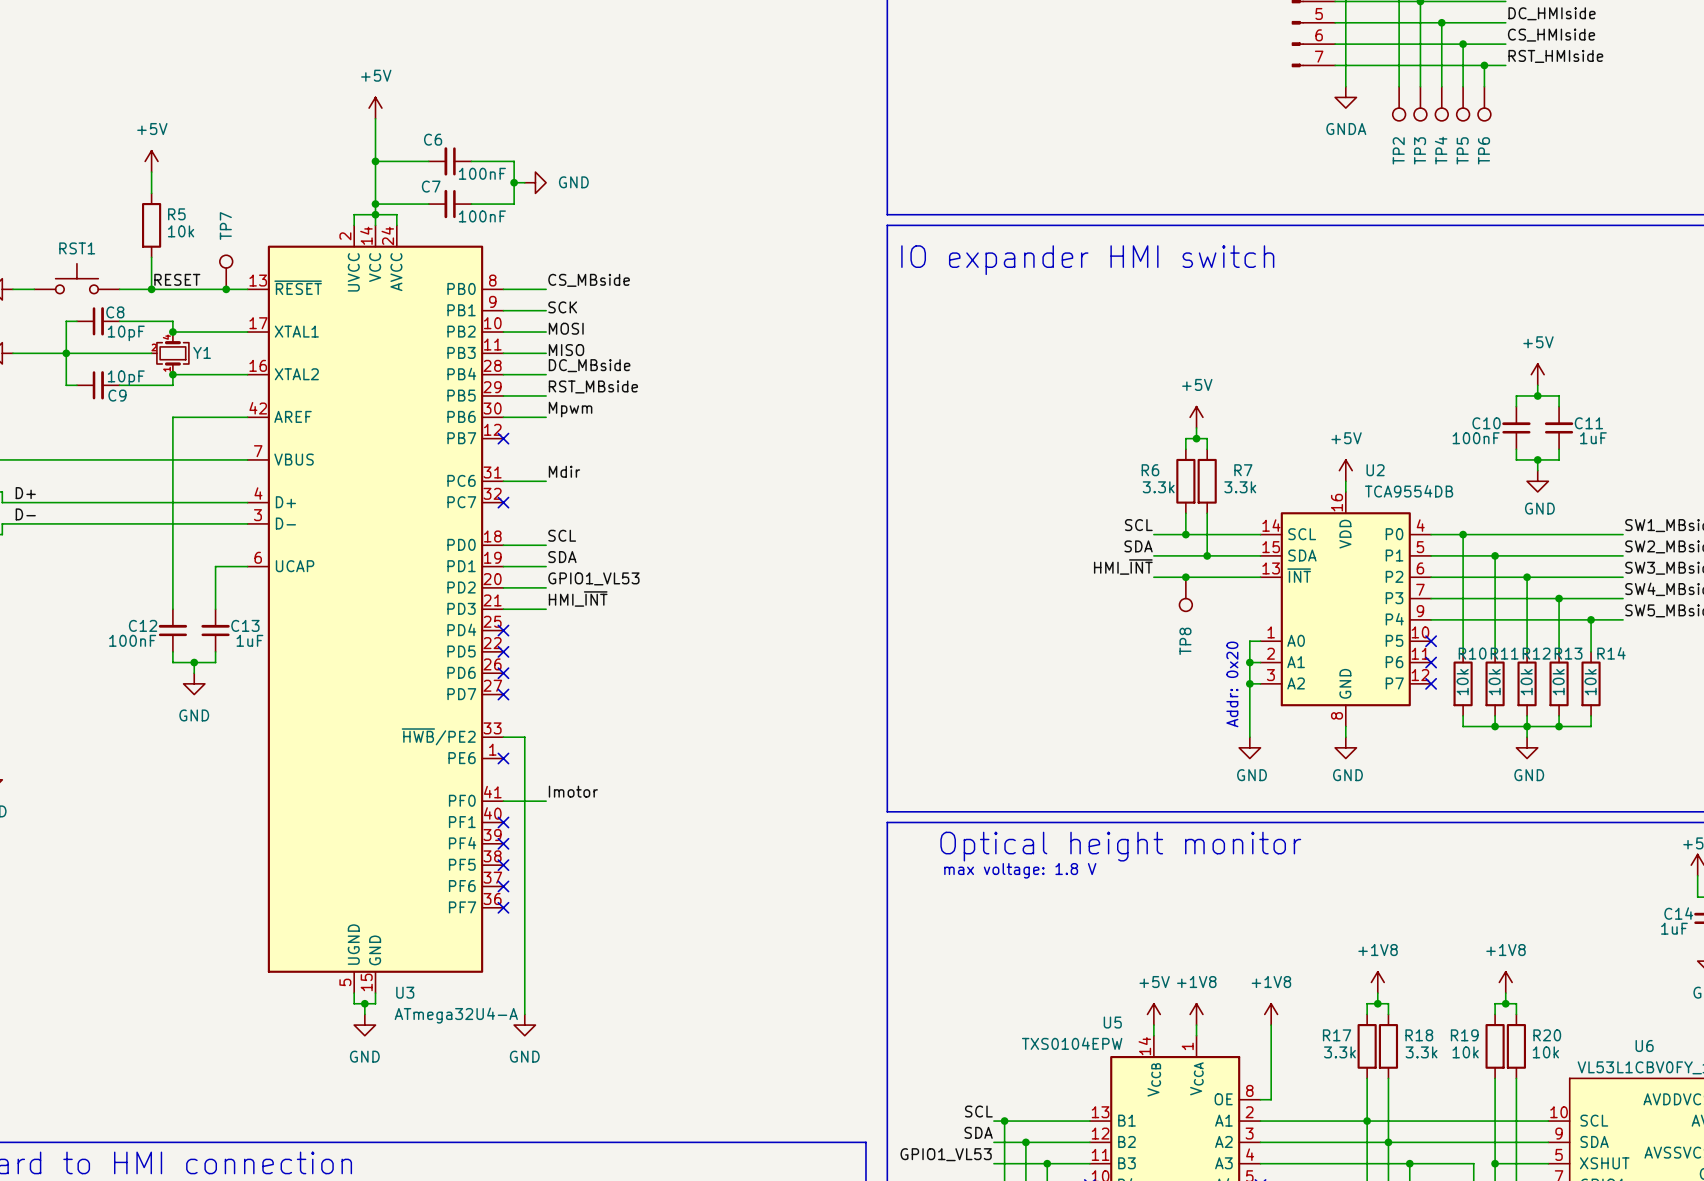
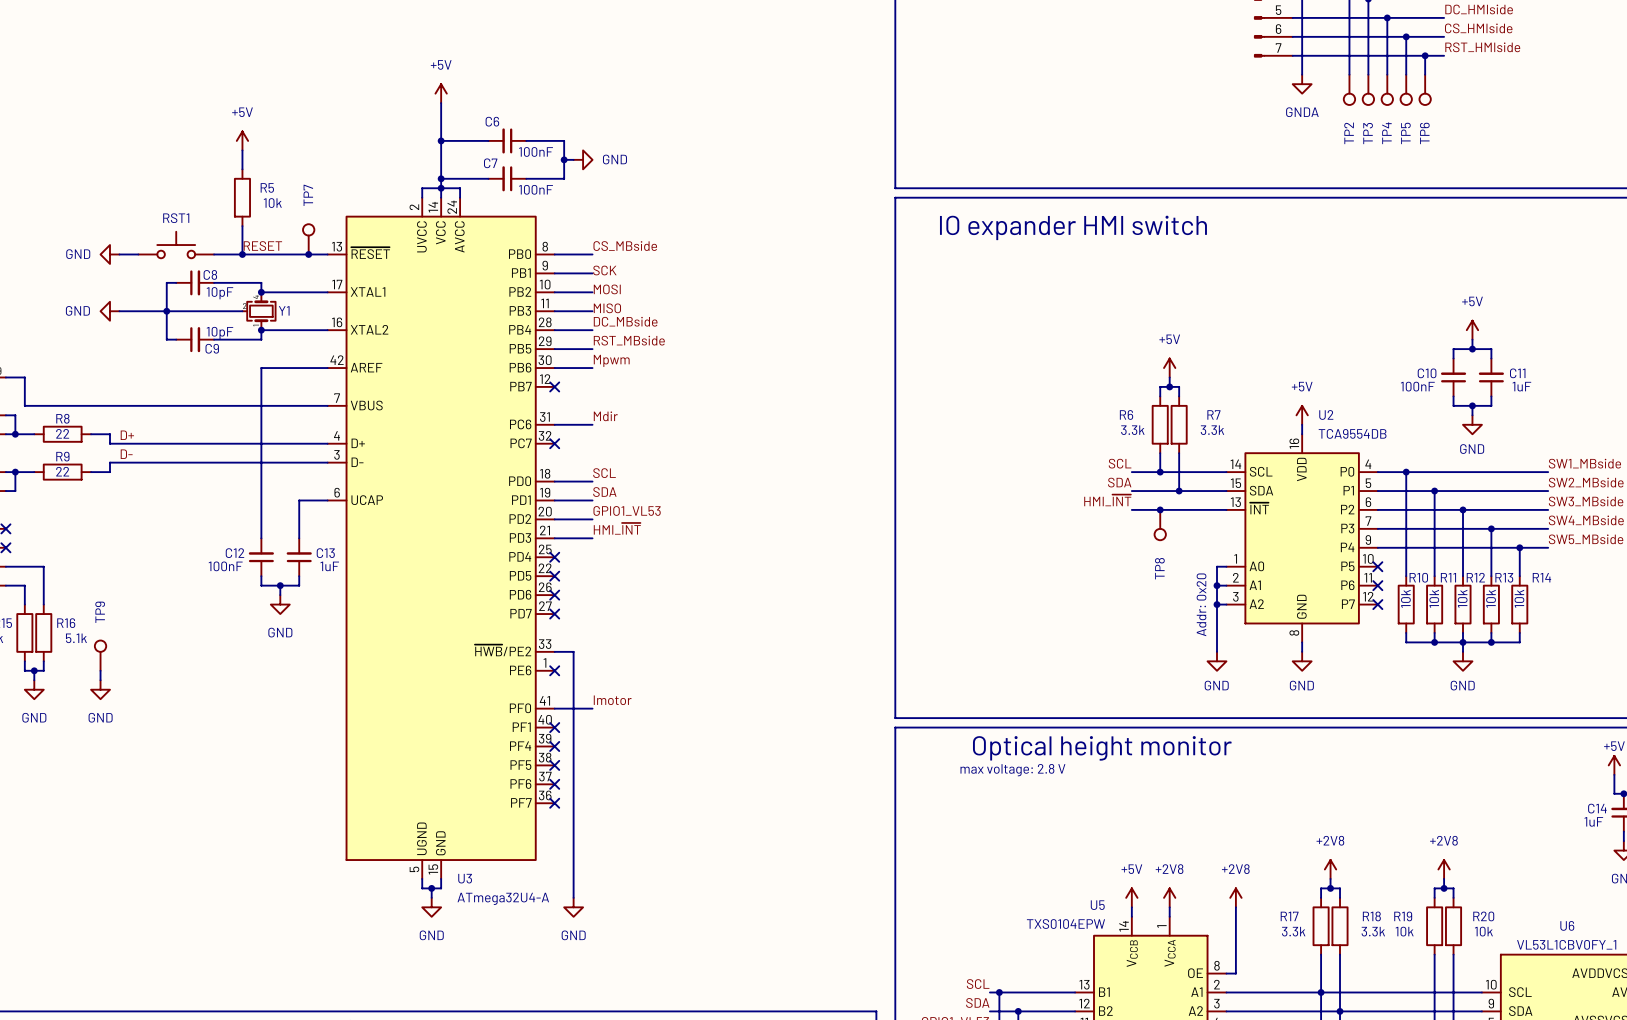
text: max voltage: 1.8 V (1020, 870) -> max voltage: 2.8 V (1012, 770)
power symbol: +1V8 (1377, 982) -> +2V8 (1330, 869)
power symbol: +1V8 (1505, 982) -> +2V8 (1444, 869)
power symbol: +1V8 (1196, 1014) -> +2V8 (1169, 897)
power symbol: +1V8 (1271, 1014) -> +2V8 (1235, 897)

